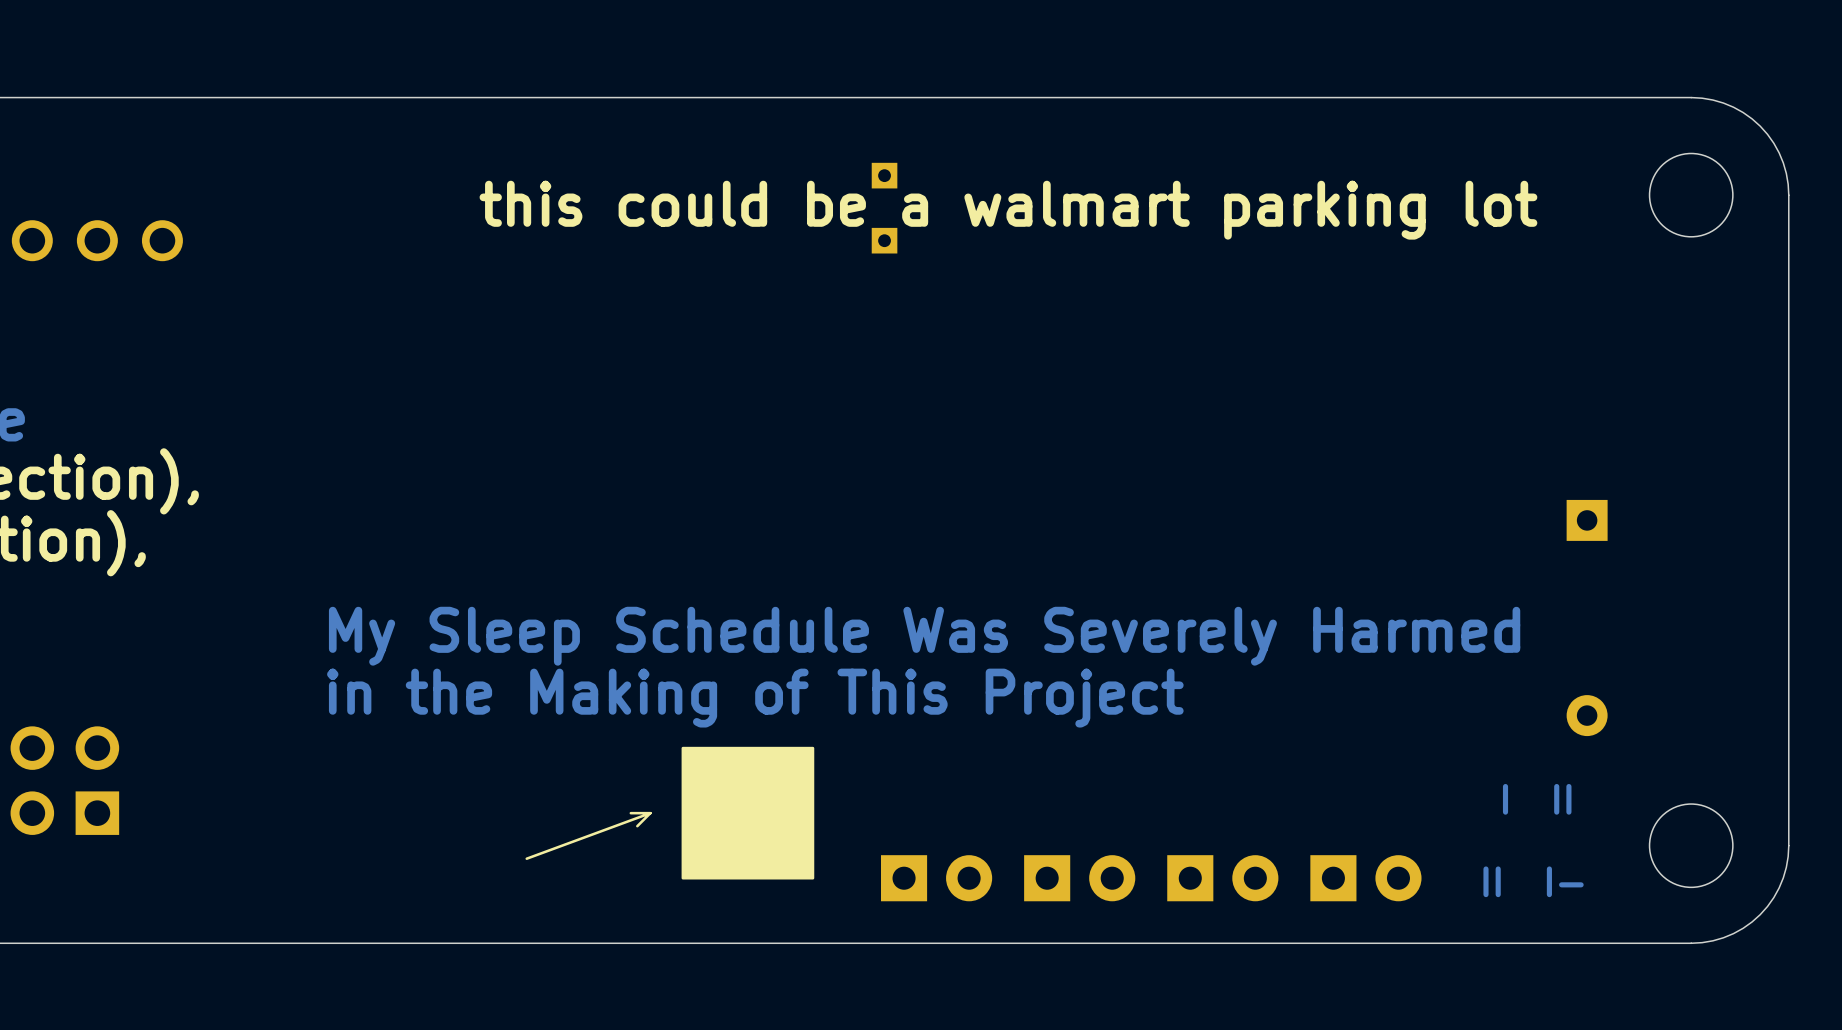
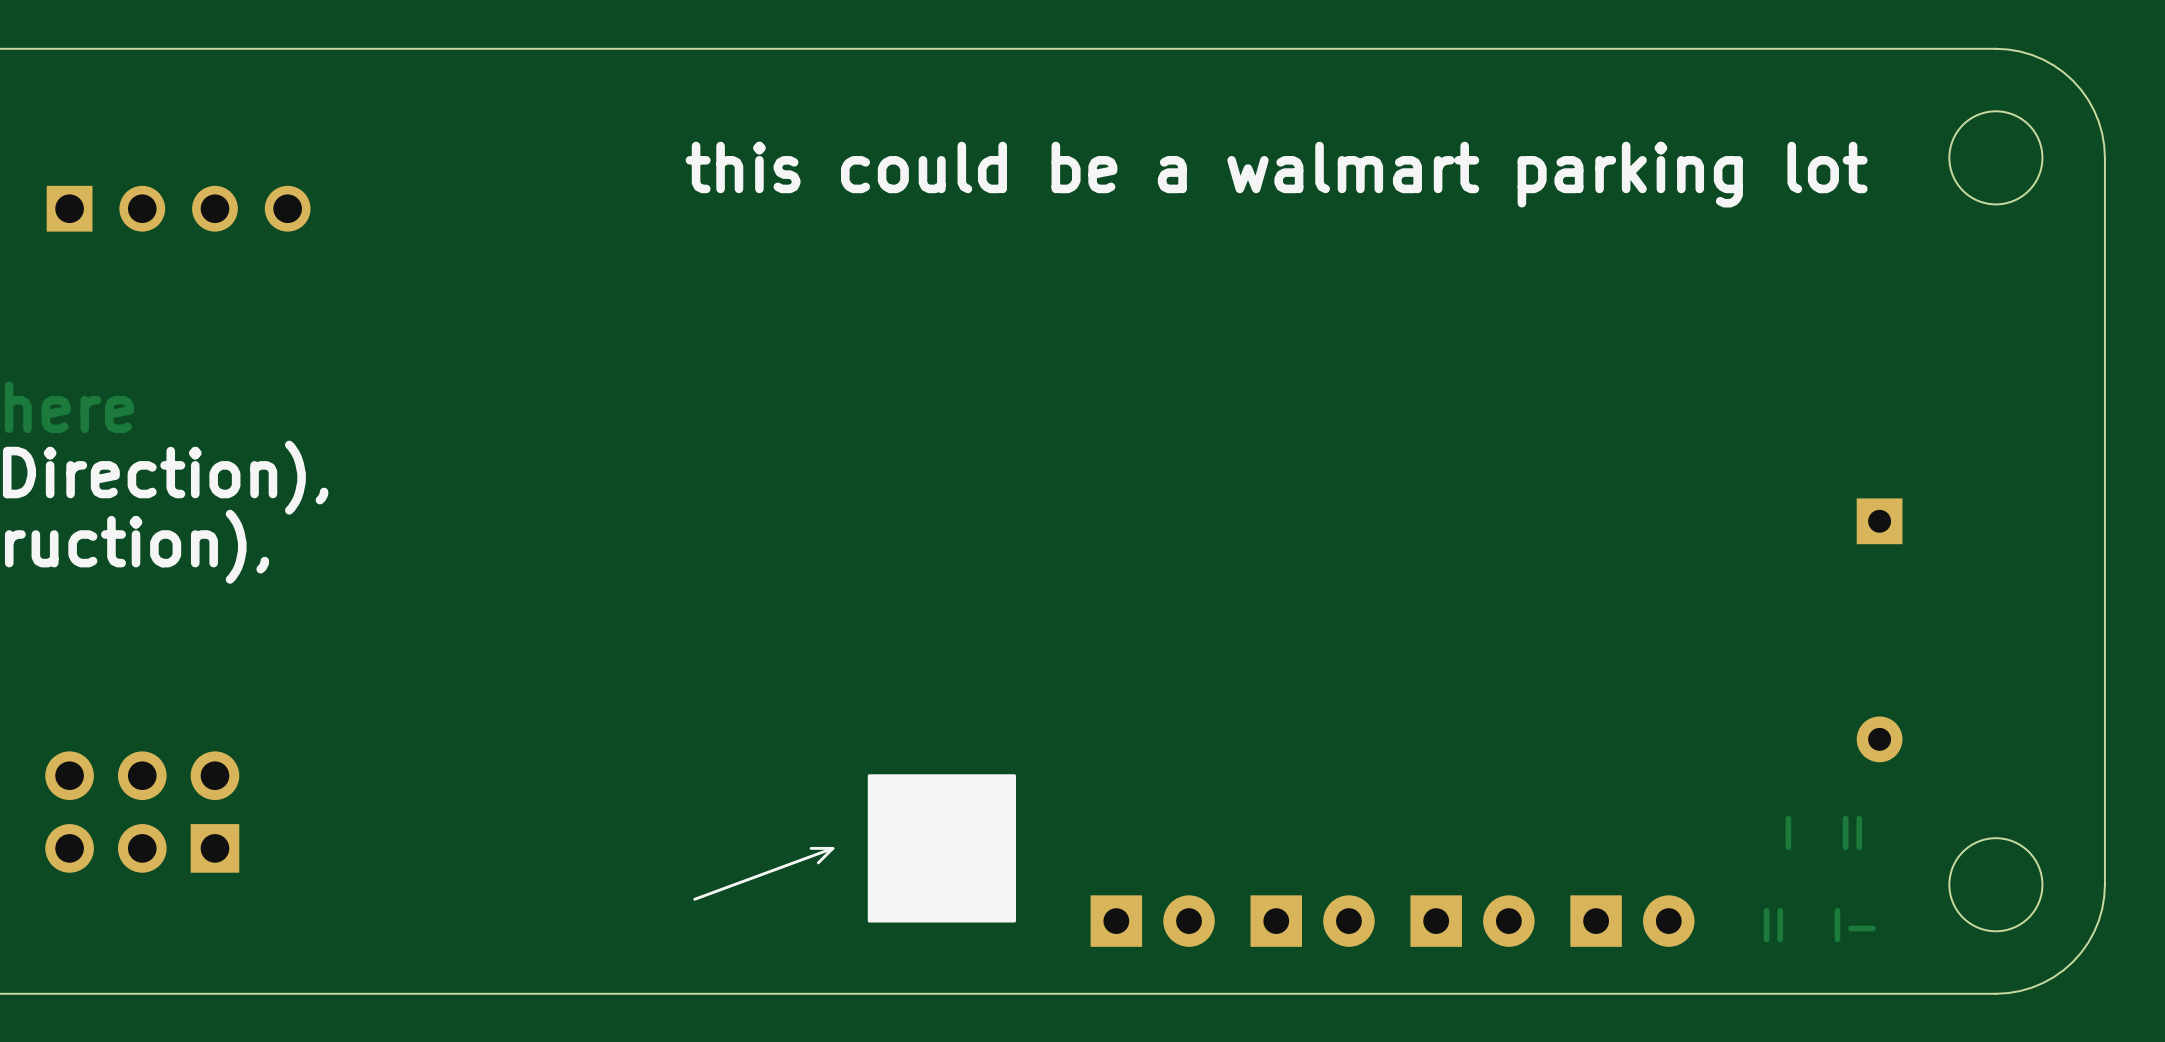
part: (884, 175) -> none
text position: this could be a walmart parking lot (1008, 210) -> this could be a walmart parking lot (1276, 174)
part: (884, 240) -> none
text: My Sleep Schedule Was Severely Harmed (924, 636) -> none
text: in the Making of This Project (755, 698) -> none

